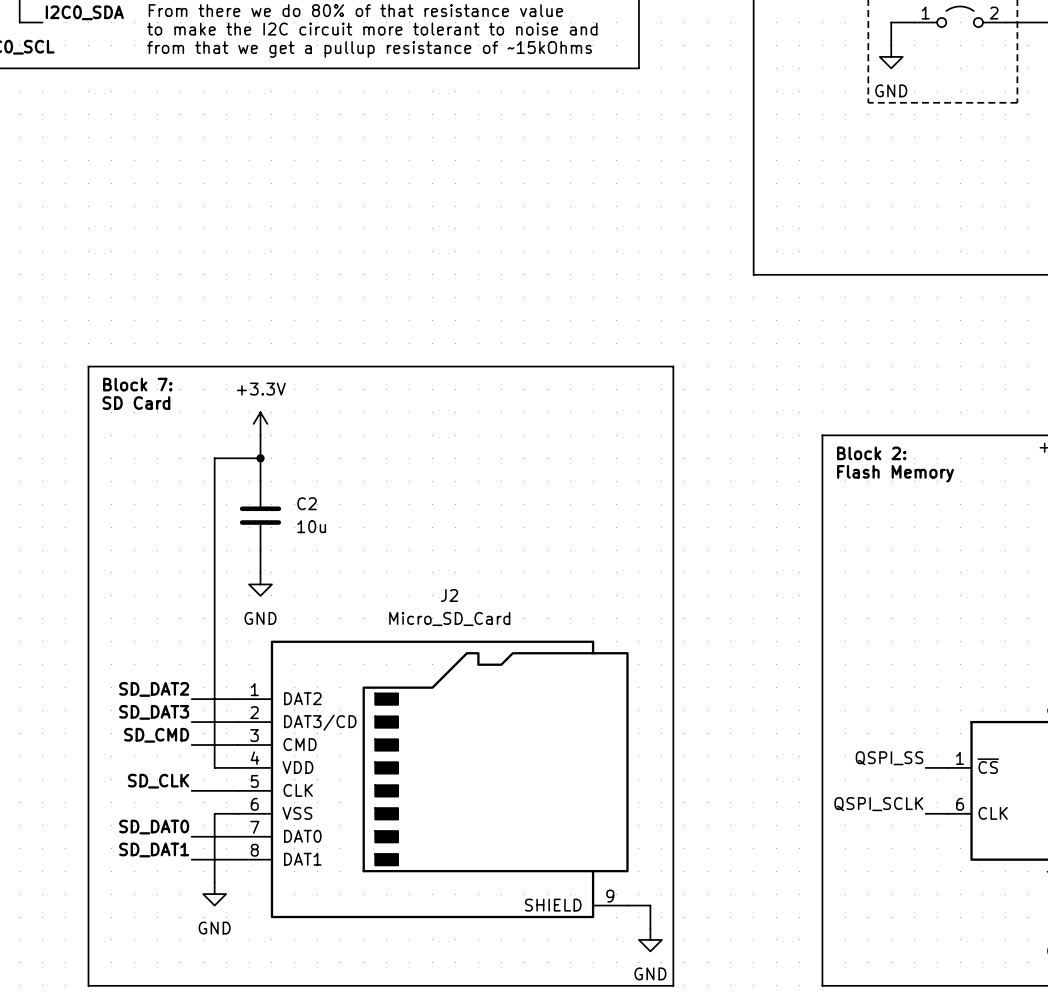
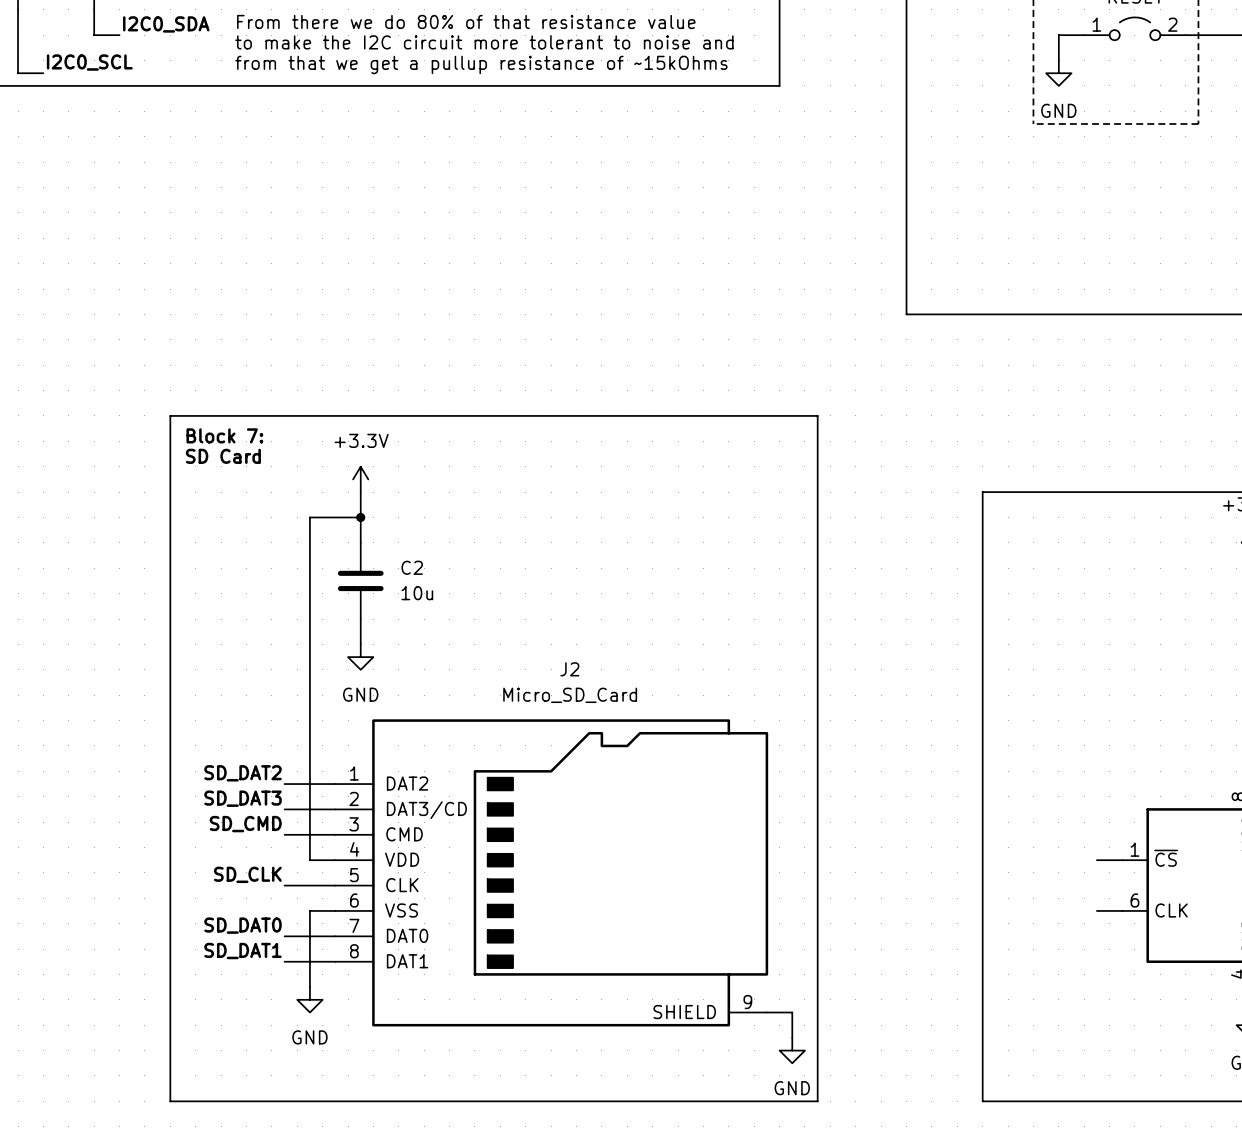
text: Block 2: (871, 453) -> none
text: Flash Memory (895, 473) -> none
label: QSPI_SS (889, 758) -> none
label: QSPI_SCLK (878, 804) -> none

